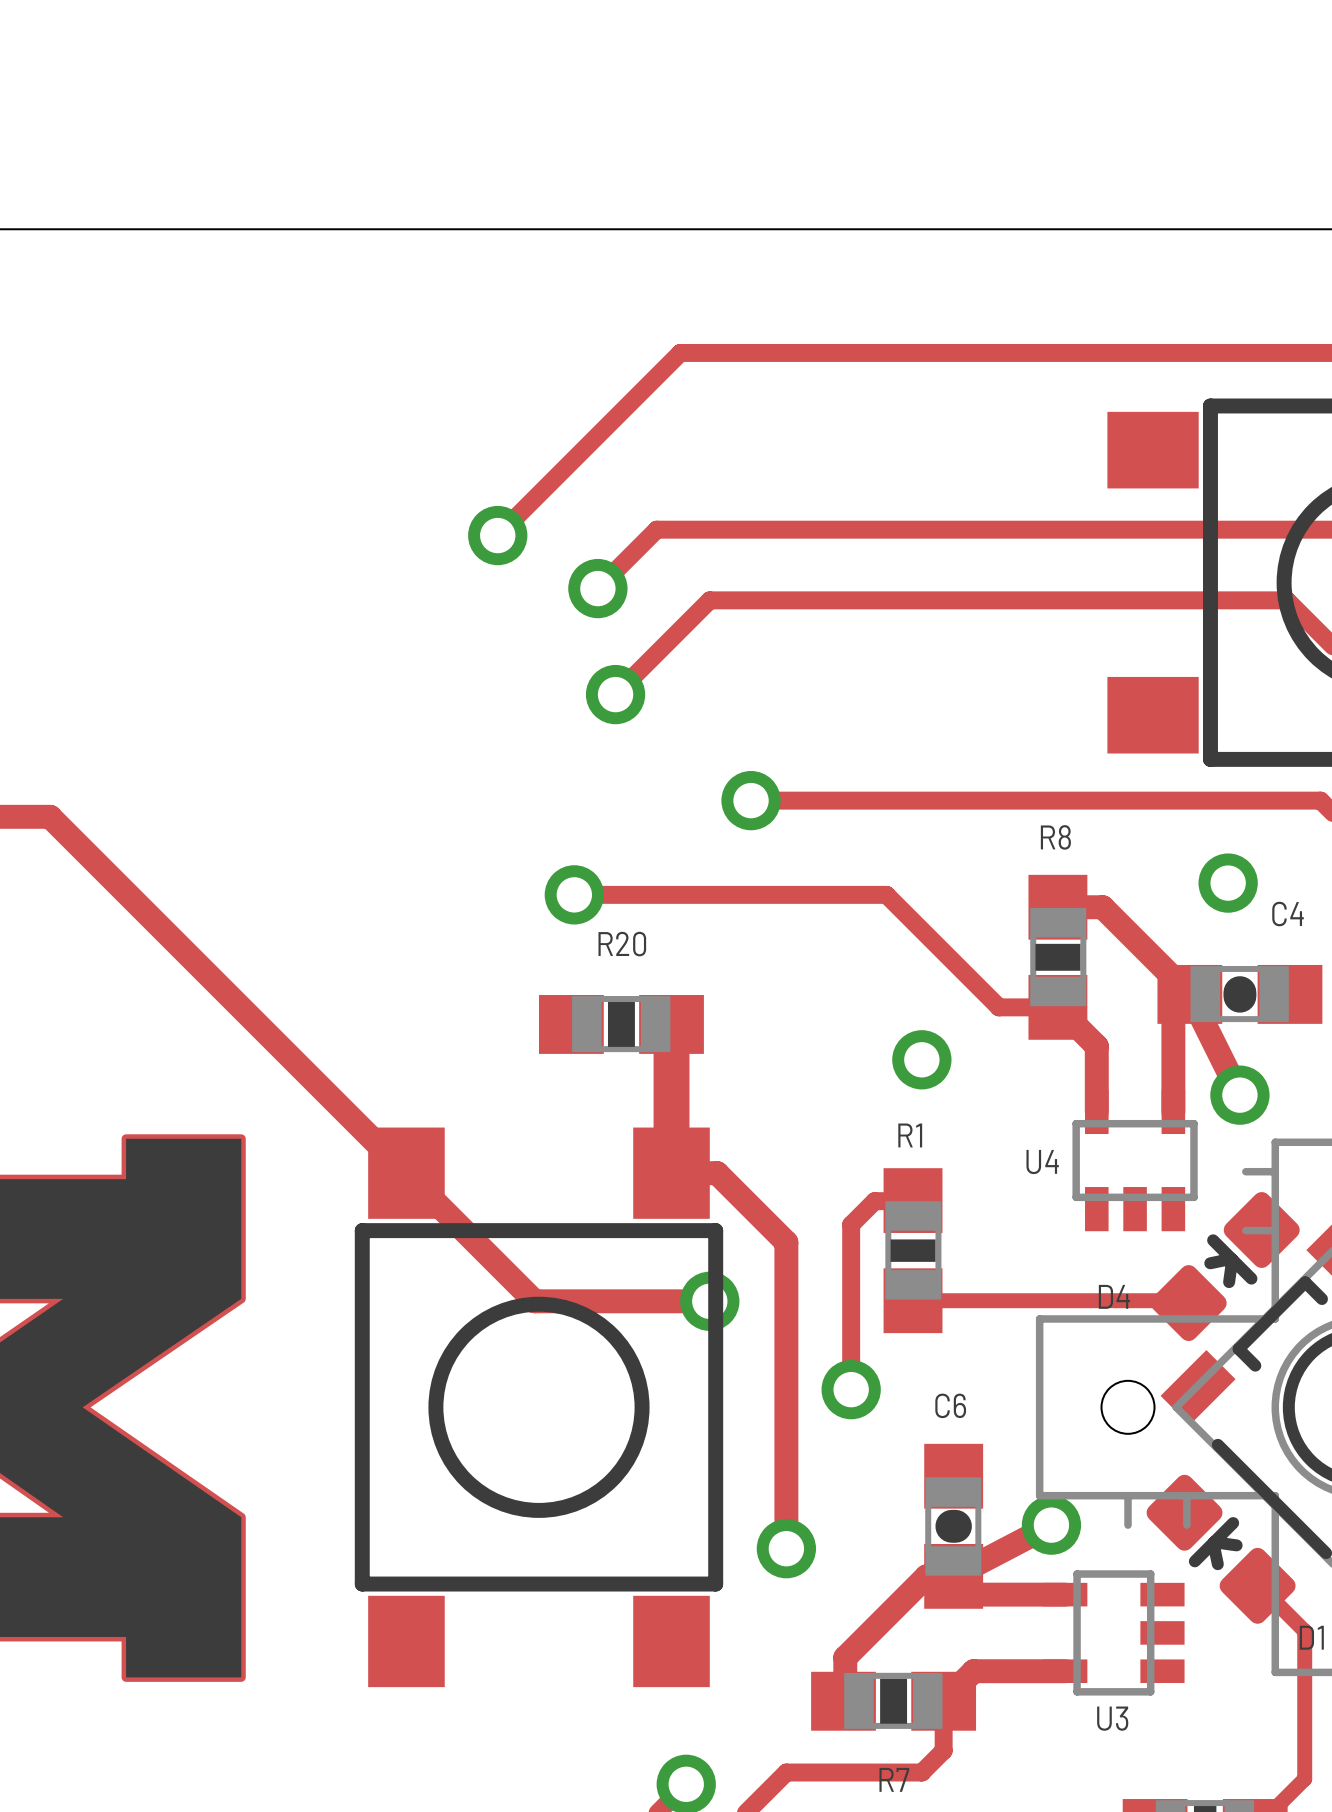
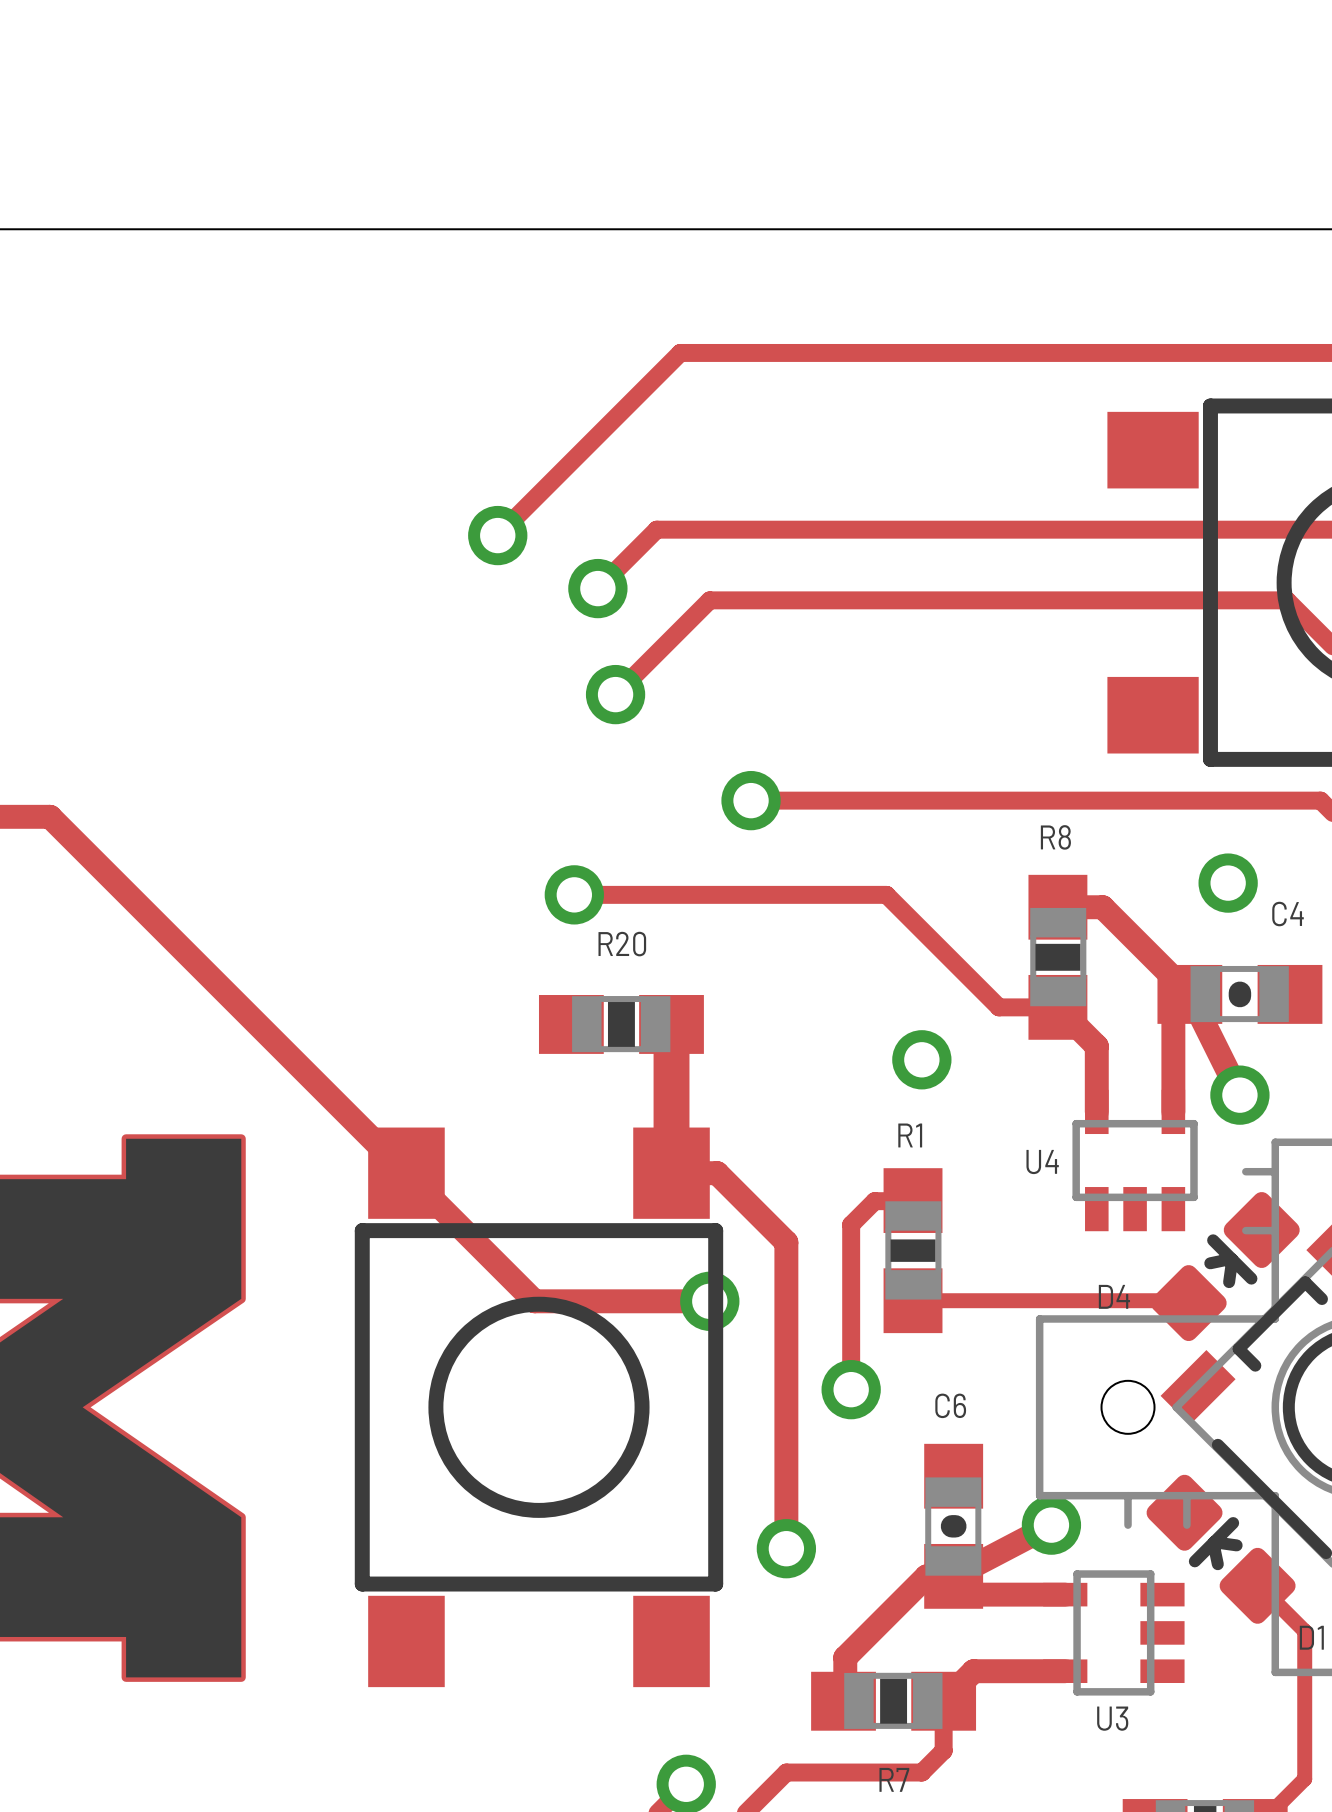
C4 footprint: [1157, 964, 1323, 1024] -> [1157, 964, 1323, 1024]
C6 footprint: [924, 1443, 984, 1609] -> [924, 1443, 984, 1609]

